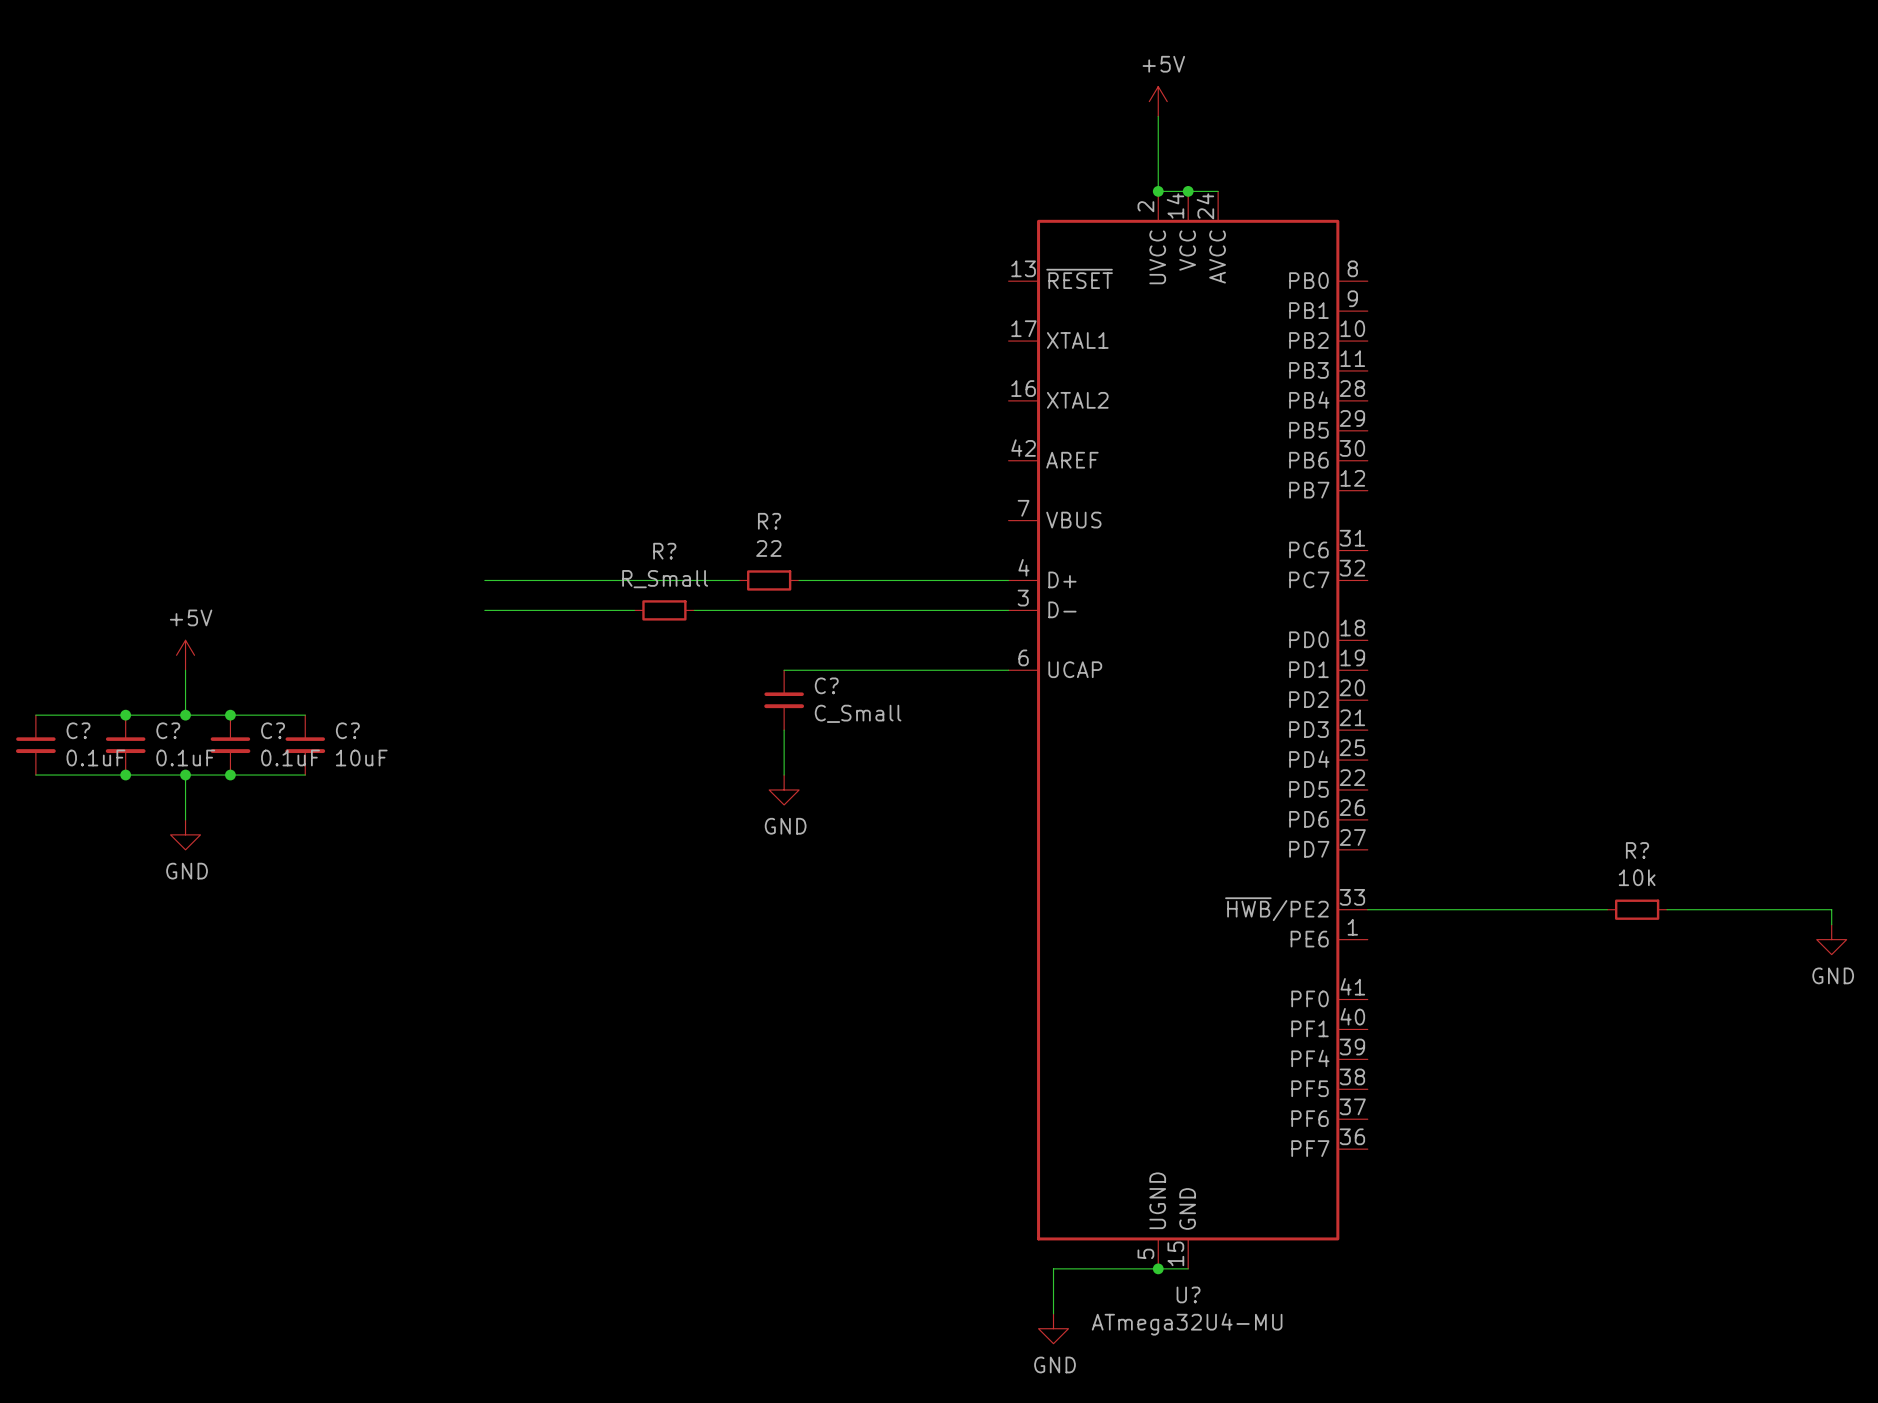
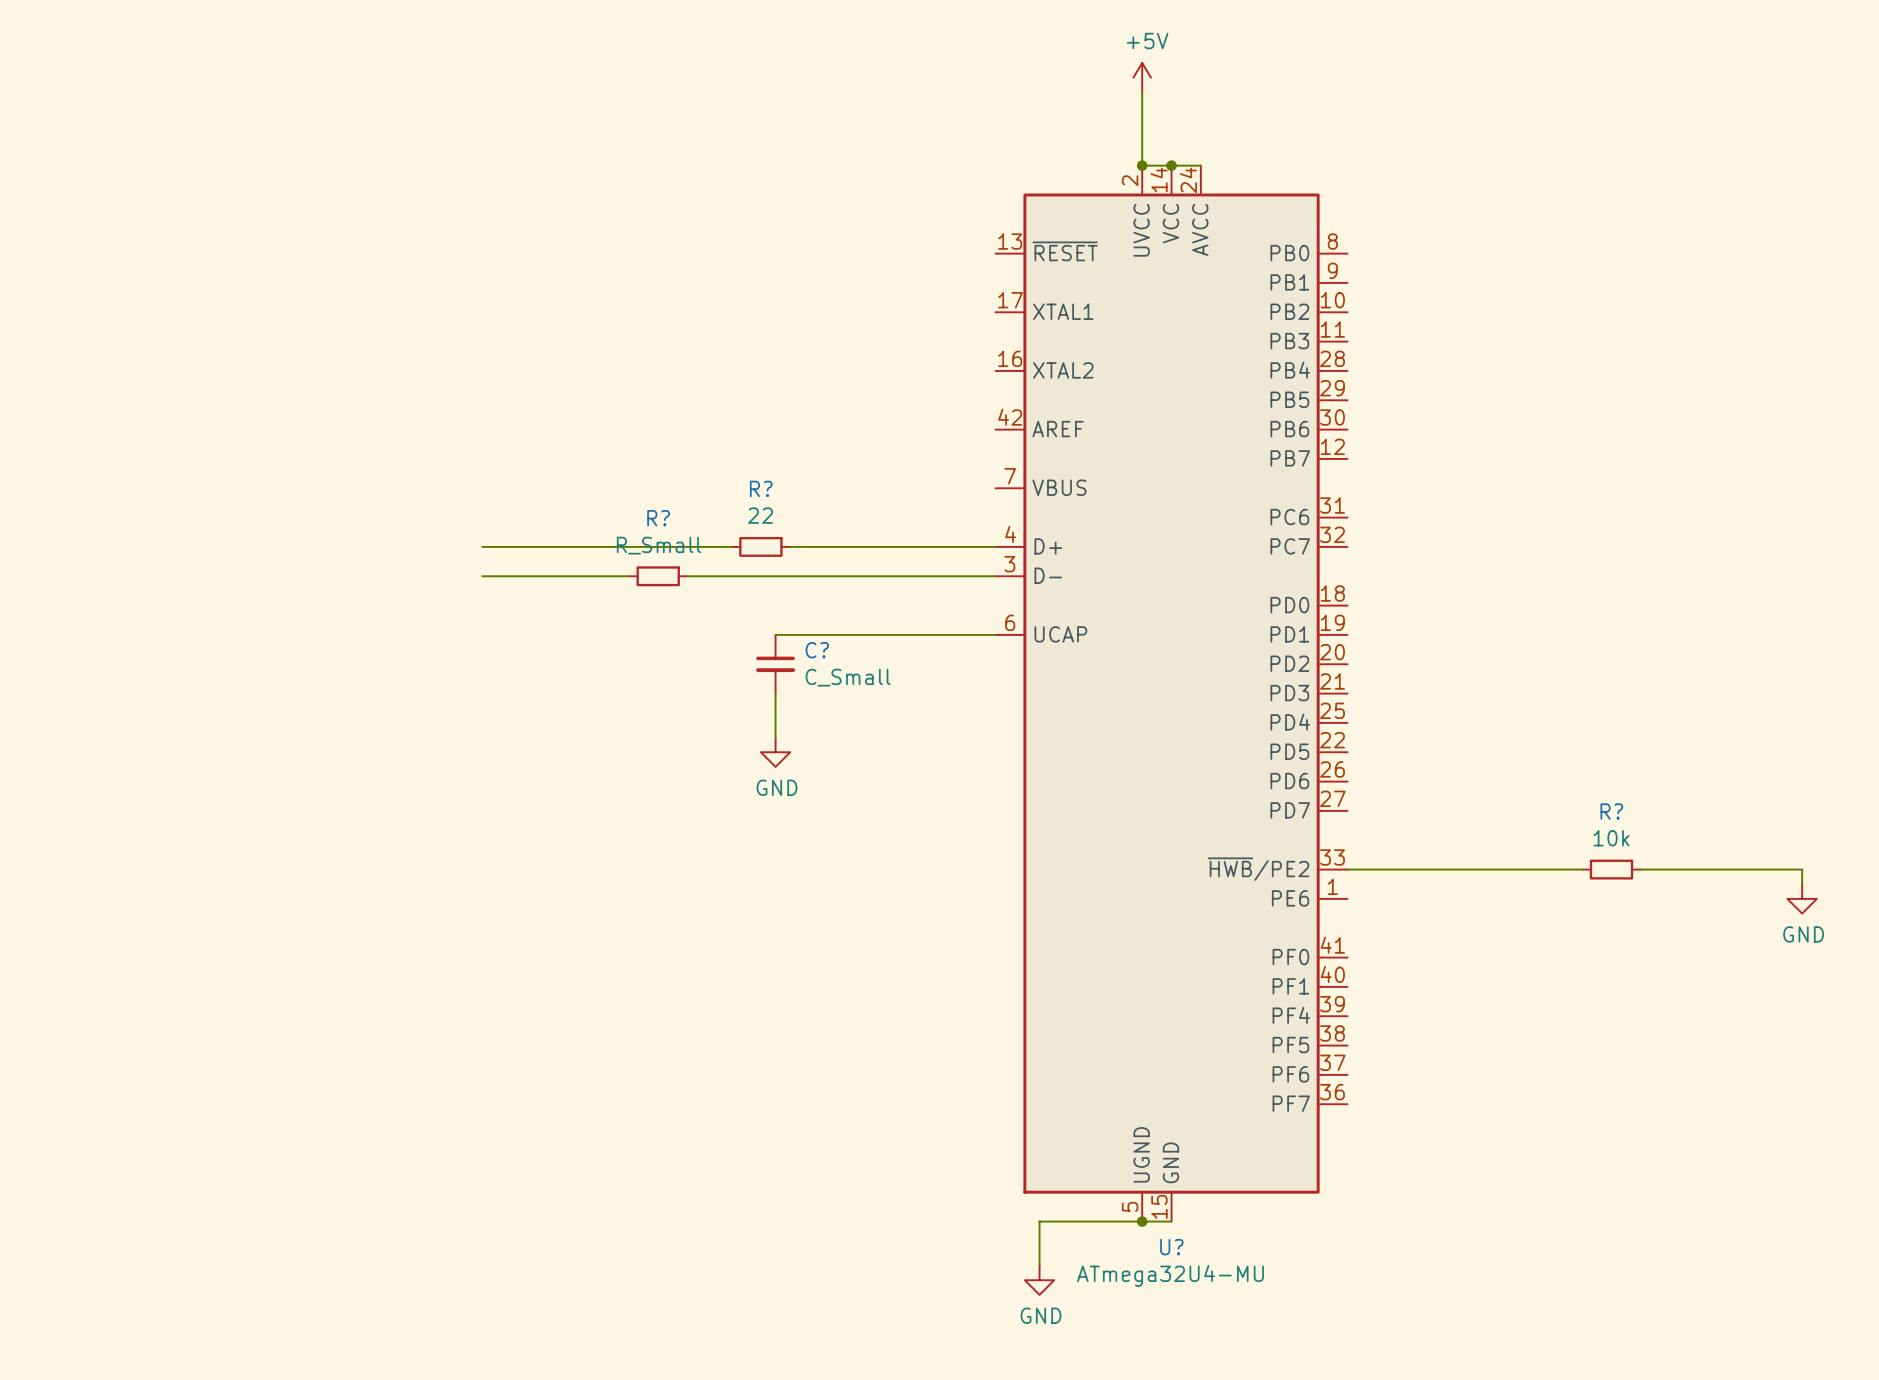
power symbol: +5V (185, 655) -> none
wire: (185, 670) (185, 715) -> none
wire: (35, 715) (305, 715) -> none
junction: (125, 715) -> none
junction: (185, 715) -> none
junction: (230, 715) -> none
C?: 0.1uF (35, 745) -> none
C?: 0.1uF (125, 745) -> none
C?: 0.1uF (230, 745) -> none
C?: 10uF (305, 745) -> none
wire: (35, 775) (305, 775) -> none
junction: (125, 775) -> none
wire: (185, 775) (185, 819) -> none
junction: (185, 775) -> none
junction: (230, 775) -> none
power symbol: GND (185, 834) -> none

